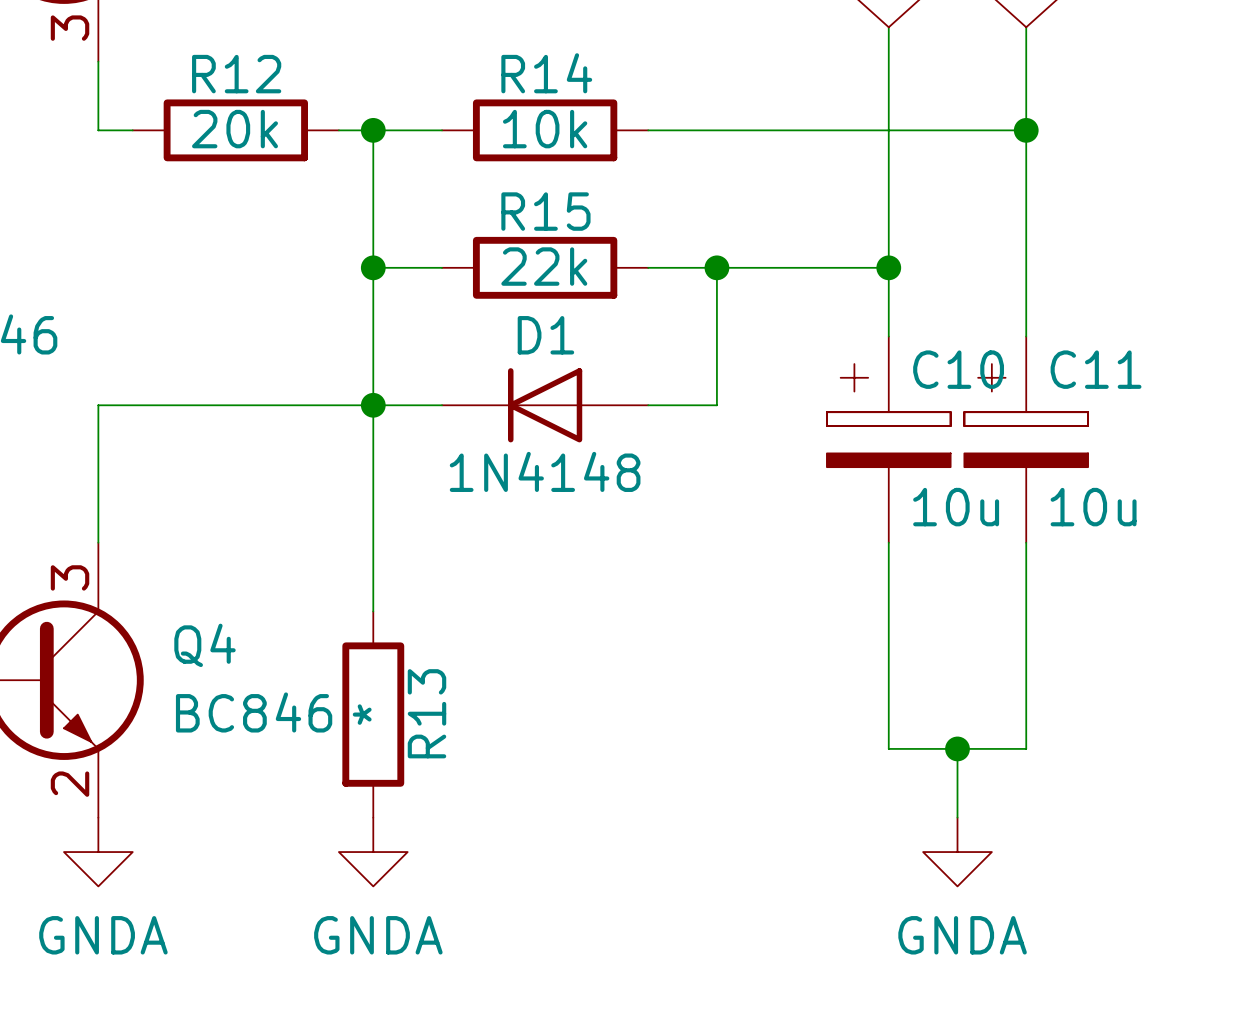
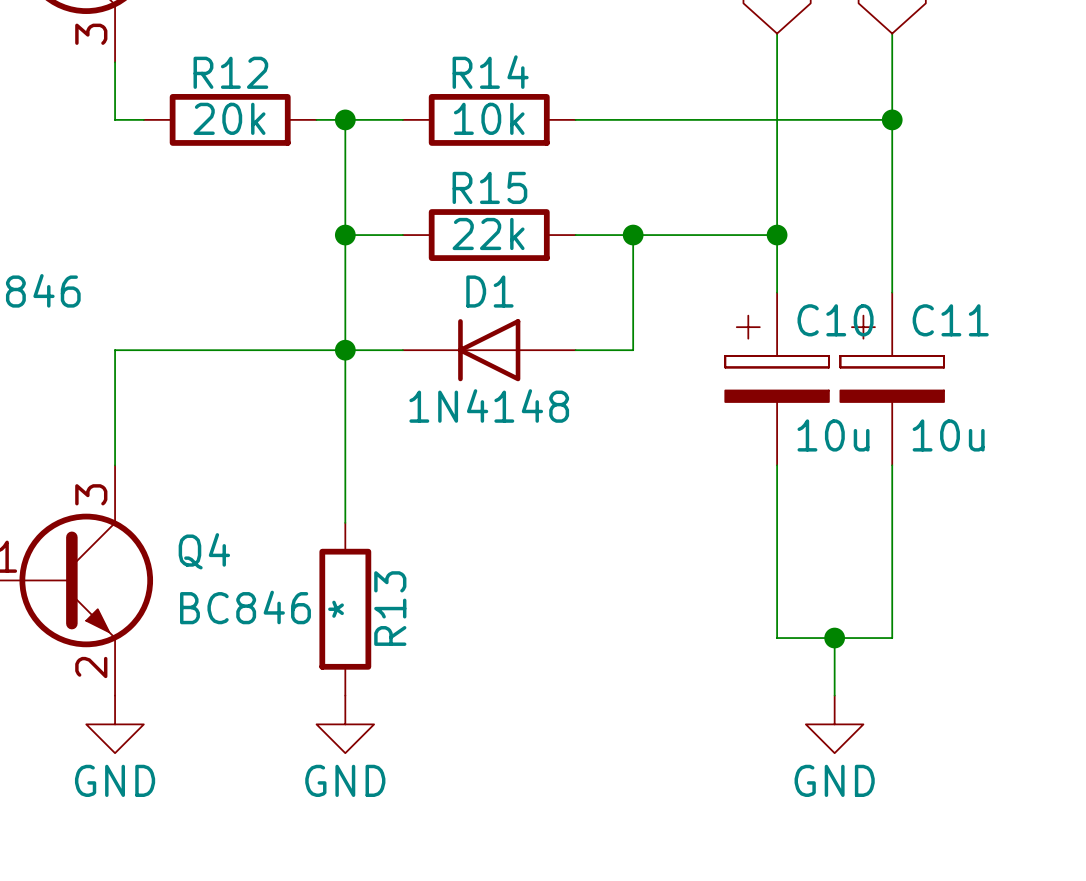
power symbol: GNDA (98, 852) -> GND (115, 724)
power symbol: GNDA (373, 852) -> GND (345, 724)
power symbol: GNDA (957, 852) -> GND (834, 724)

